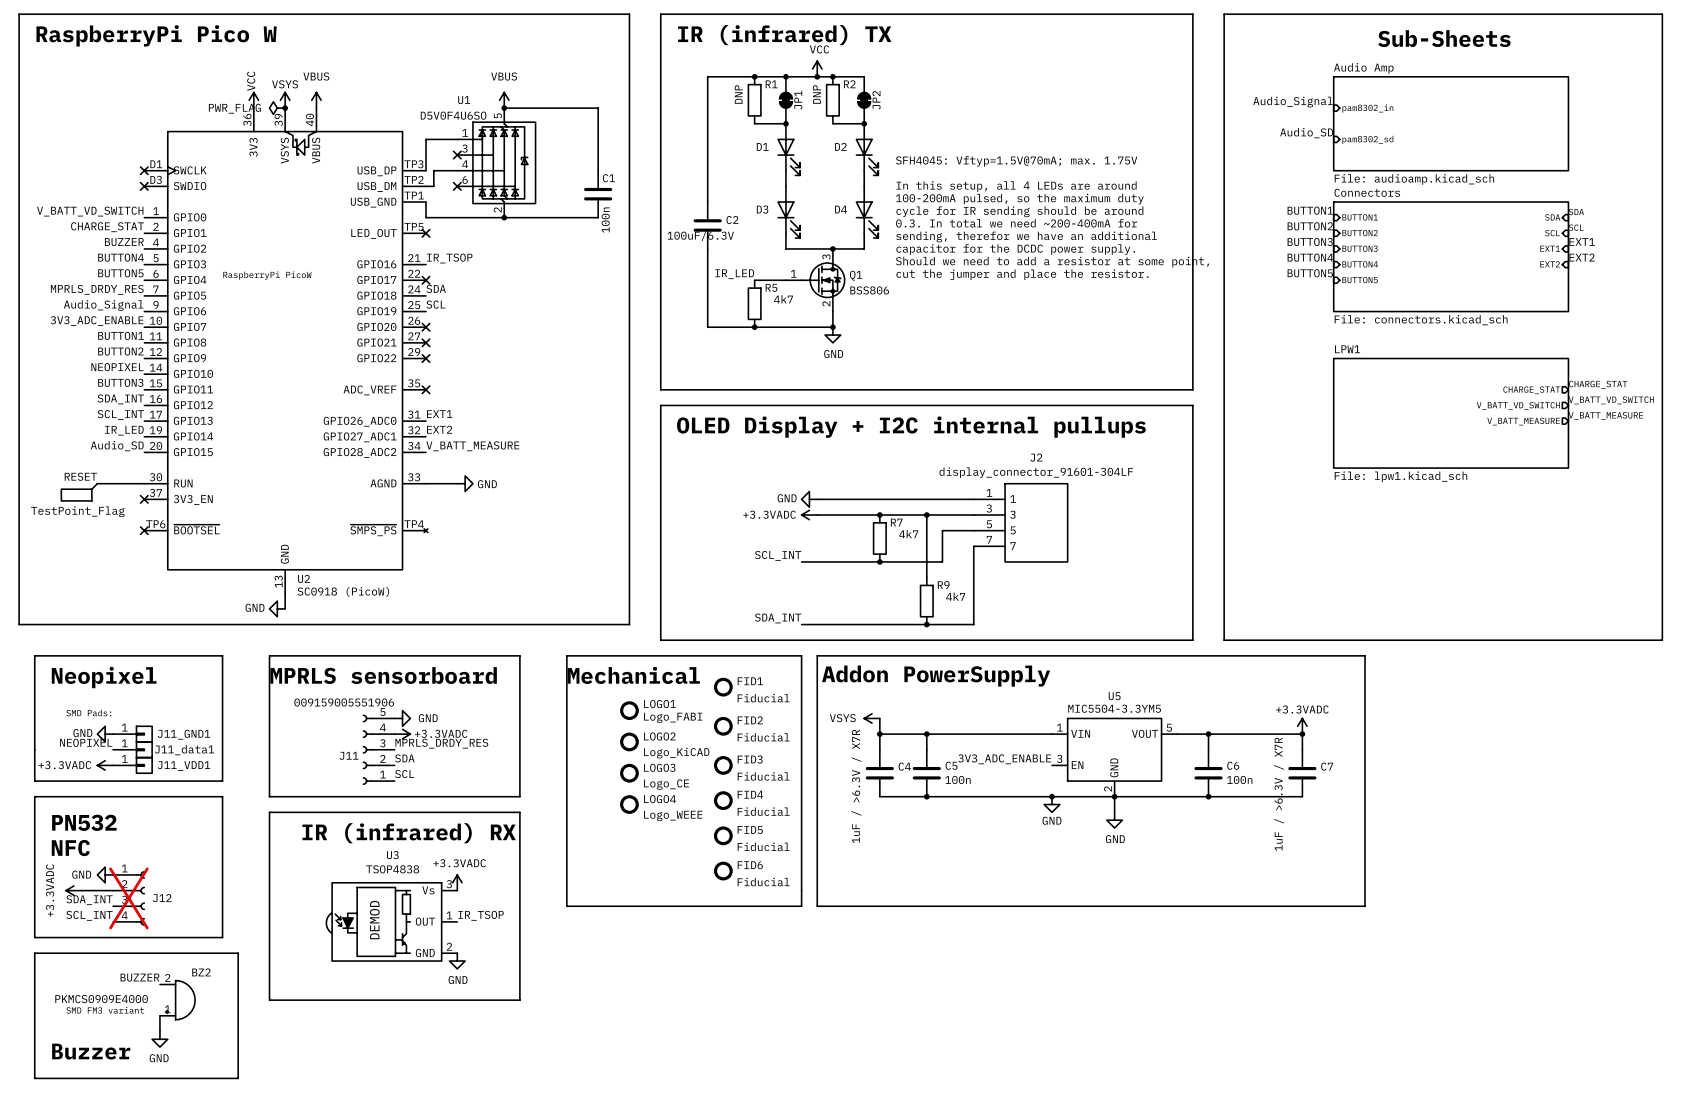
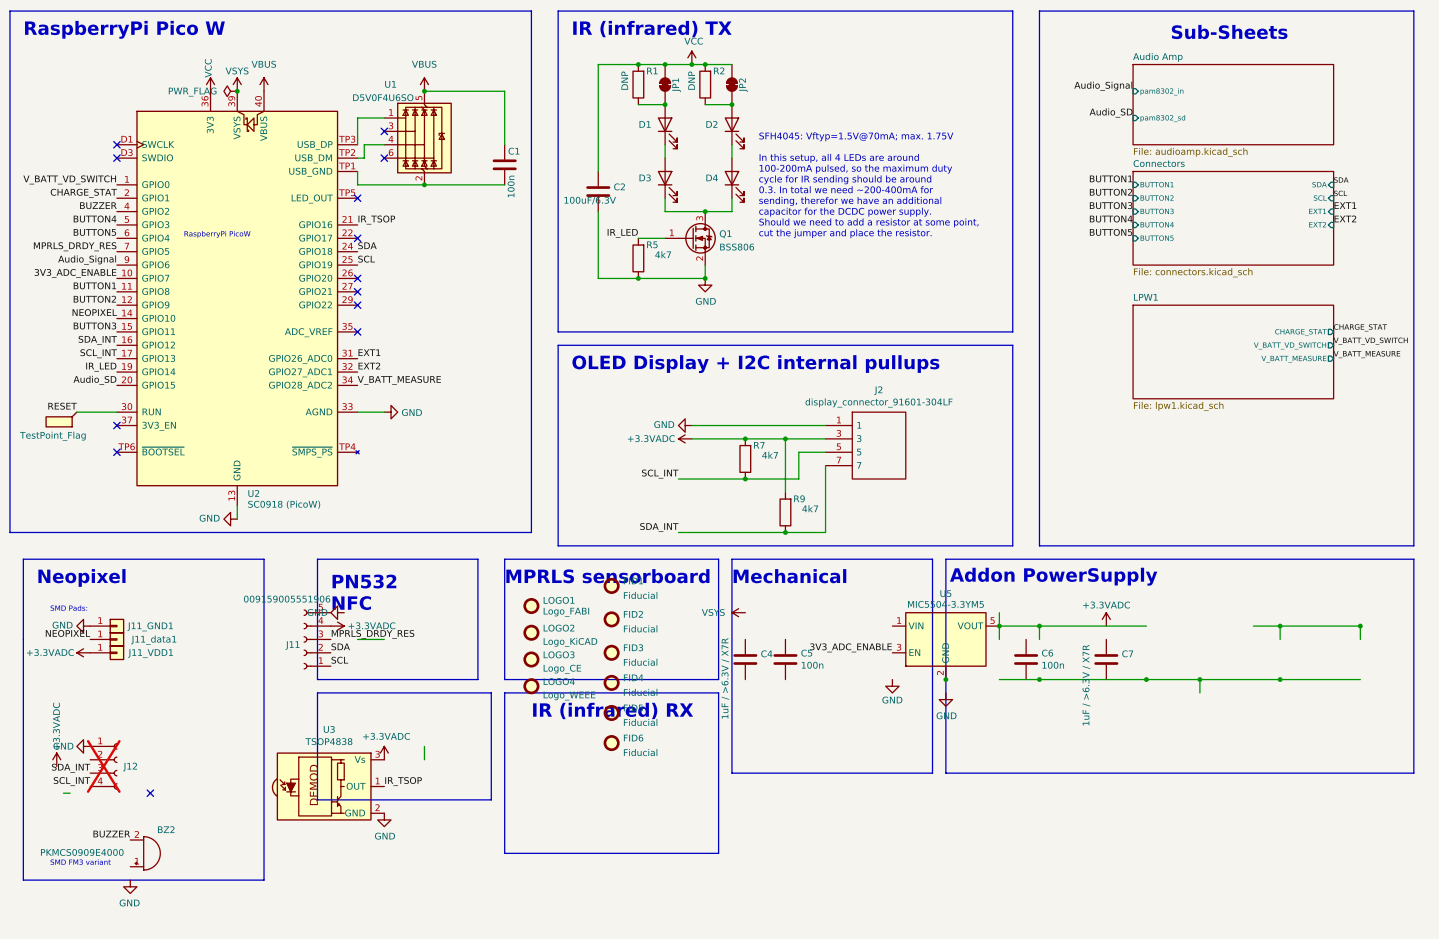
line: (222, 655) (222, 781) (34, 781) -> (183, 559) (223, 559)
line: (269, 655) (269, 796) (379, 796) -> (317, 559) (317, 679)
line: (316, 655) (379, 655) -> (264, 559) (264, 880) (23, 880)
line: (519, 655) (519, 796) -> (477, 679) (437, 679)
line: (566, 655) (598, 655) -> (477, 559) (437, 559)
line: (801, 655) (801, 906) (566, 906) (566, 796) -> (678, 559) (691, 559)
line: (817, 655) (817, 906) (864, 906) -> (731, 559) (731, 773)
line: (848, 655) (864, 655) -> (718, 559) (718, 679) (504, 679) (504, 559)
line: (1098, 655) (1114, 655) -> (932, 559) (932, 773)
line: (1365, 655) (1365, 906) -> (1159, 559) (1413, 559) (1413, 773) (1159, 773)
text: MPRLS sensorboard (383, 675) -> none
text: Mechanical (633, 675) -> none
text: none -> MPRLS sensorboard (607, 576)
text: none -> Mechanical (789, 576)
text: Addon PowerSupply (936, 676) -> none
text: none -> Addon PowerSupply (1053, 576)
text: none -> PN532 (364, 581)
text: none -> NFC (351, 603)
power symbol rotation: 0° (402, 718) -> 180° (337, 612)
wire: (879, 718) (879, 749) -> none
wire: none -> (999, 612) (999, 639)
wire: (879, 734) (1052, 734) -> none
junction: (879, 734) -> none
wire: (926, 734) (926, 749) -> none
junction: (926, 734) -> none
junction: none -> (999, 626)
wire: (1208, 734) (1208, 749) -> (1039, 626) (1039, 639)
junction: (1208, 734) -> none
junction: none -> (1039, 626)
wire: (1302, 734) (1302, 749) -> (1106, 626) (1146, 626)
junction: (1302, 734) -> none
wire: none -> (1253, 626) (1360, 626) (1360, 639)
wire: none -> (1280, 626) (1280, 639)
junction: none -> (1280, 626)
junction: none -> (1360, 626)
wire: none -> (357, 639) (384, 639)
line: (34, 796) (222, 796) (222, 937) (34, 937) -> (23, 679) (23, 666)
wire: (879, 796) (1177, 796) -> none
junction: (926, 796) -> none
junction: (1052, 796) -> none
junction position: (1208, 796) -> (1039, 679)
wire: none -> (1106, 679) (1360, 679)
junction: none -> (1146, 679)
wire: none -> (1199, 679) (1199, 692)
junction: none -> (1199, 679)
junction: none -> (1280, 679)
line: (379, 812) (269, 812) (269, 1000) (519, 1000) (519, 812) -> (317, 692) (317, 799) (491, 799) (491, 692) (437, 692)
line: none -> (504, 692) (718, 692) (718, 853) (504, 853) (504, 692)
text: PN532 (84, 822) -> none
text: IR (infrared) RX (409, 833) -> none
text: none -> IR (infrared) RX (613, 710)
text: NFC (70, 848) -> none
wire: none -> (424, 746) (424, 759)
power symbol rotation: 0° (73, 890) -> 90° clockwise (56, 759)
wire: (81, 890) (113, 890) -> none
line: (1098, 906) (1114, 906) -> (945, 559) (945, 773)
wire: none -> (63, 793) (70, 793)
no-connect mark: none -> (150, 793)
line: (34, 953) (238, 953) (238, 1078) (34, 1078) (34, 1031) -> (23, 813) (23, 799)
wire: (159, 1015) (159, 1031) -> none
text: Buzzer (91, 1051) -> none

